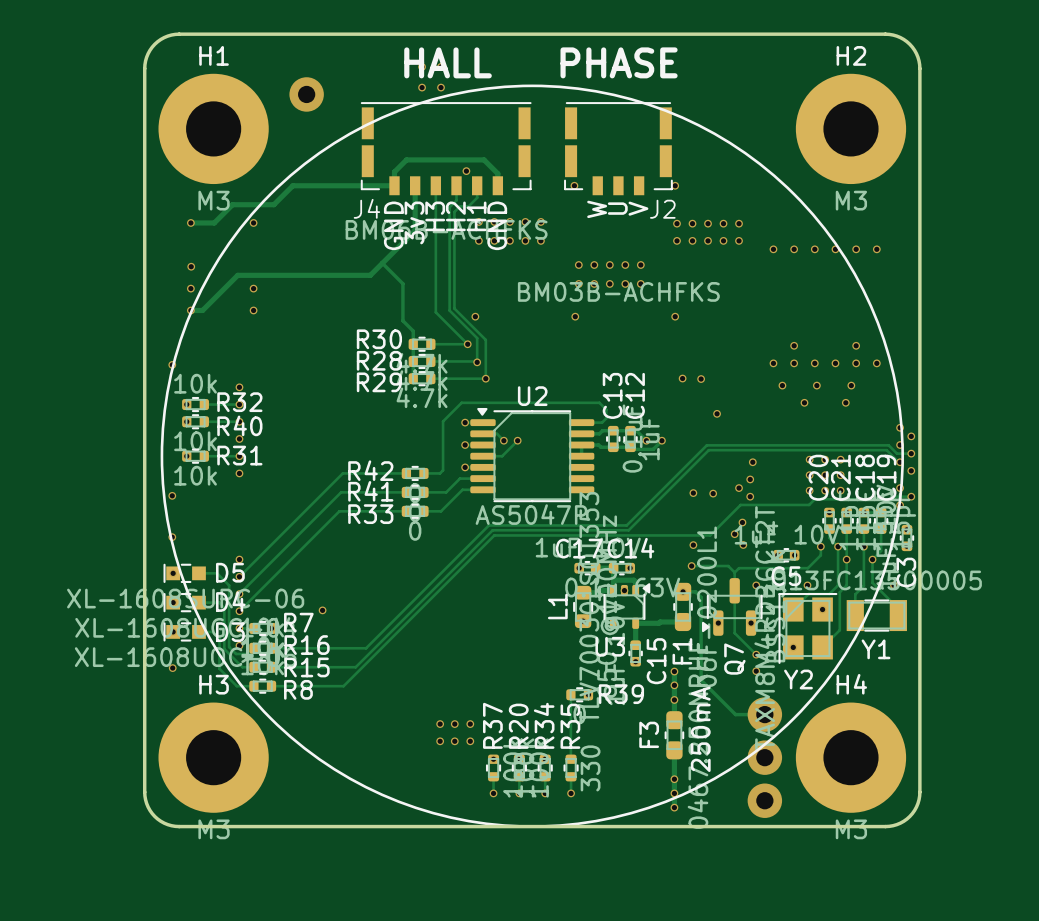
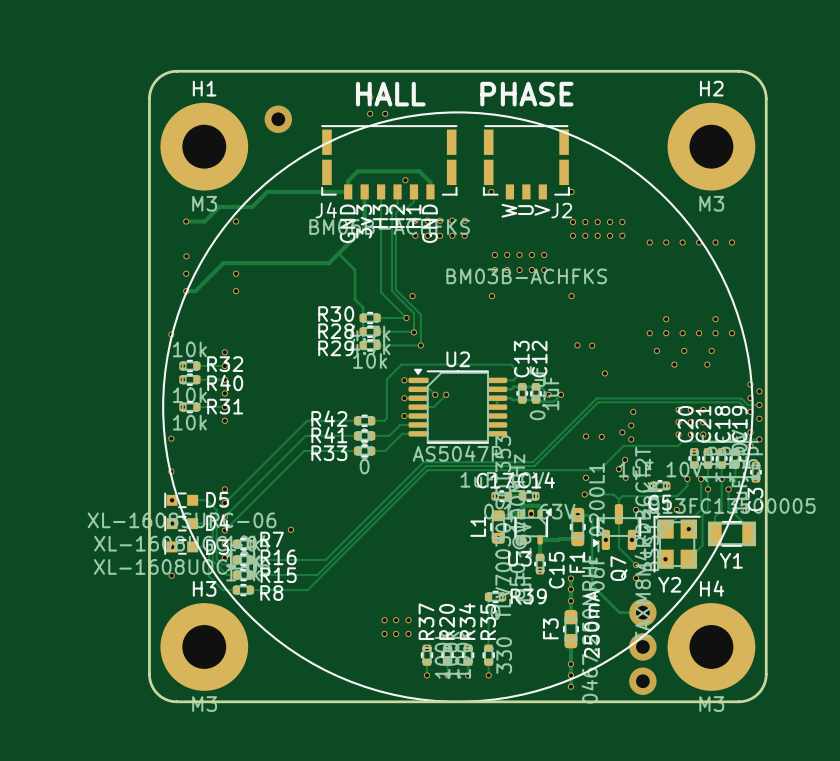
R29 value: 4.7k (422, 397) -> 10k (370, 360)

